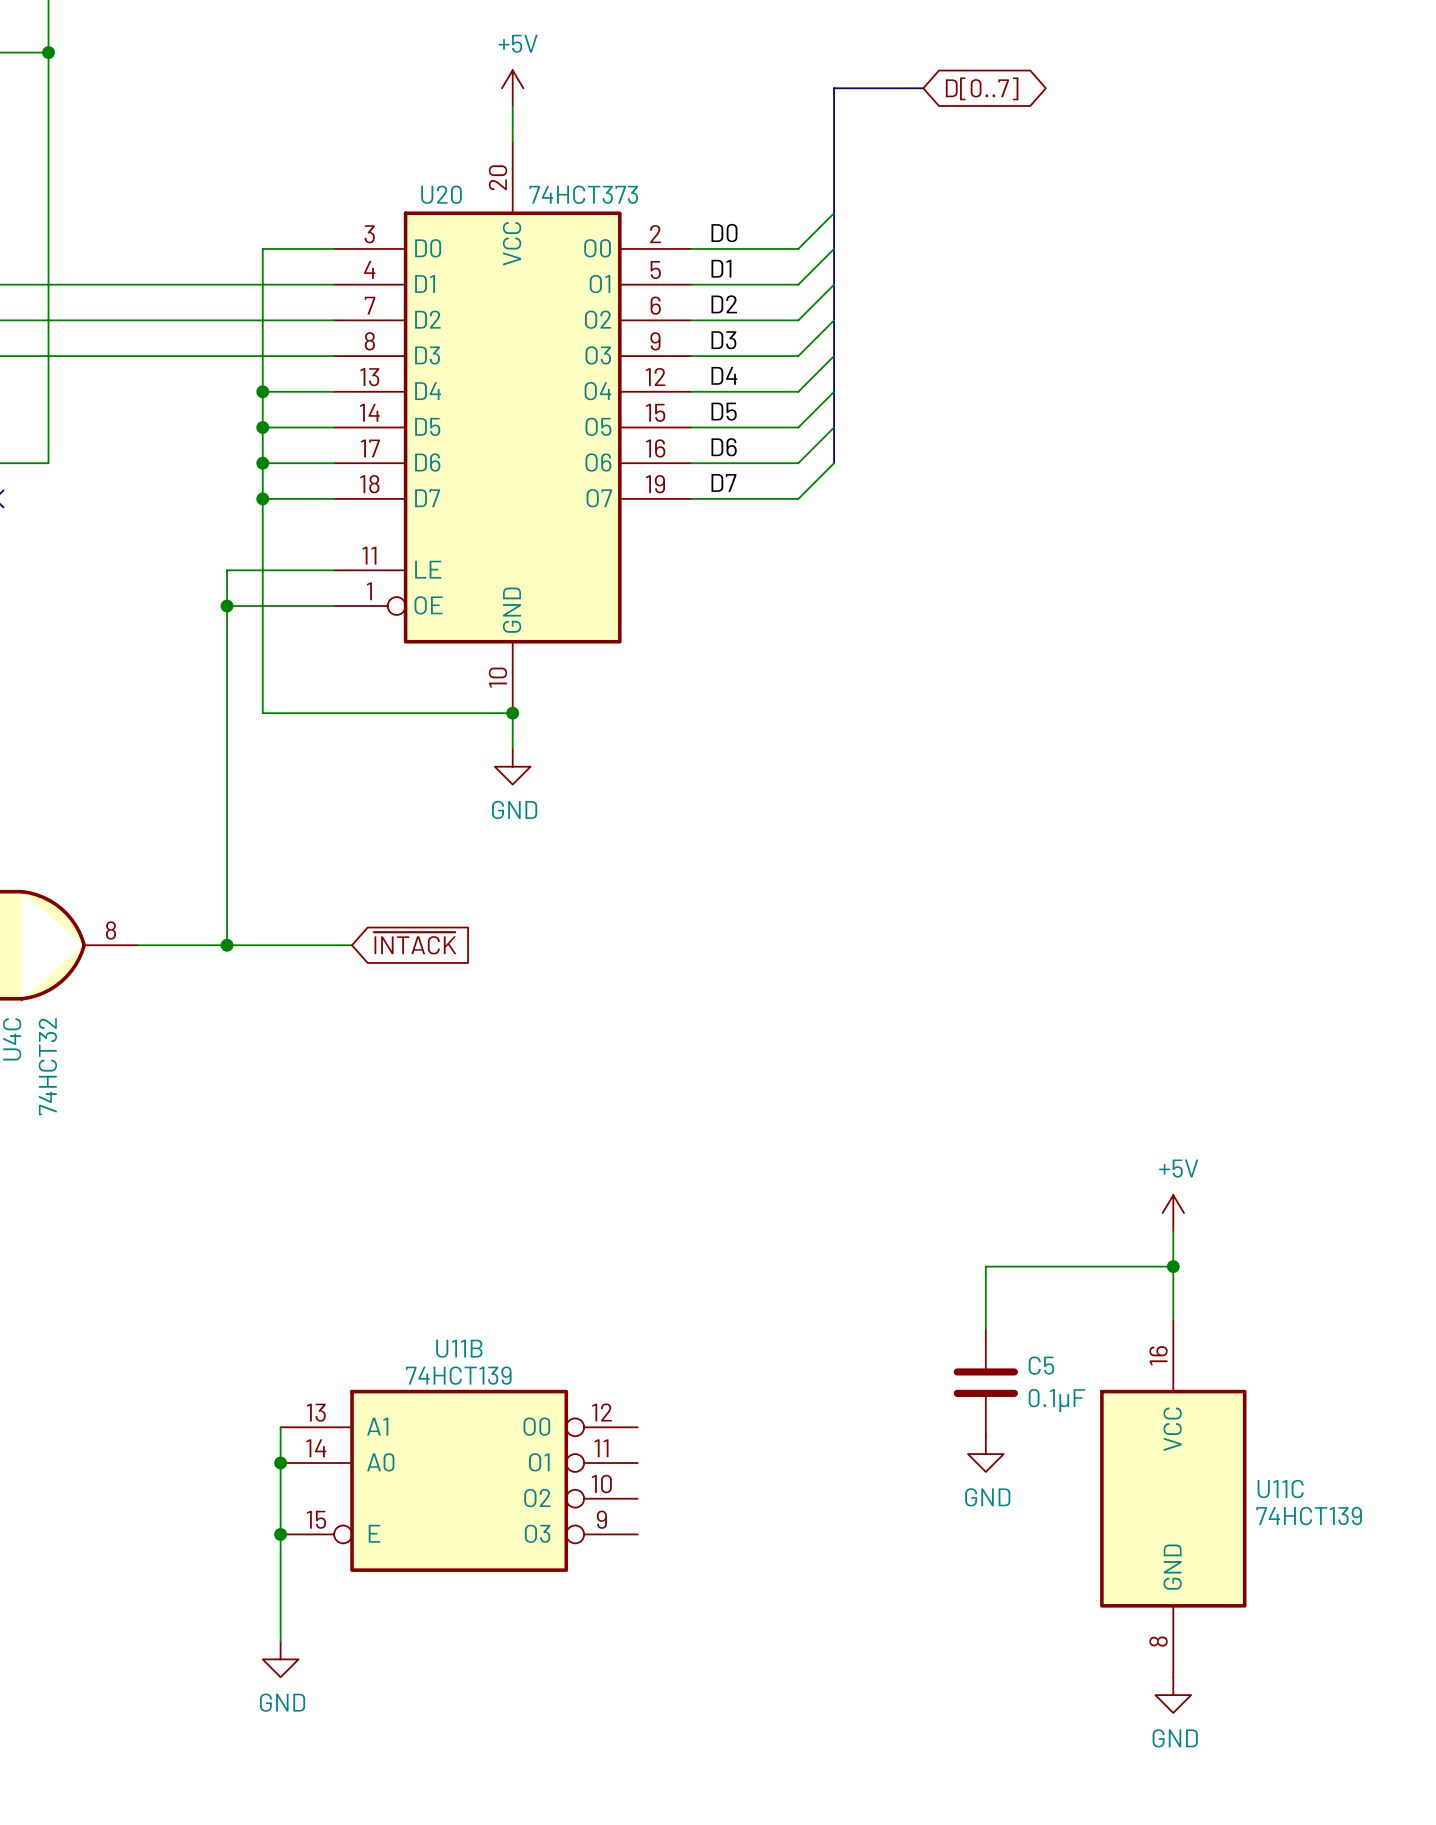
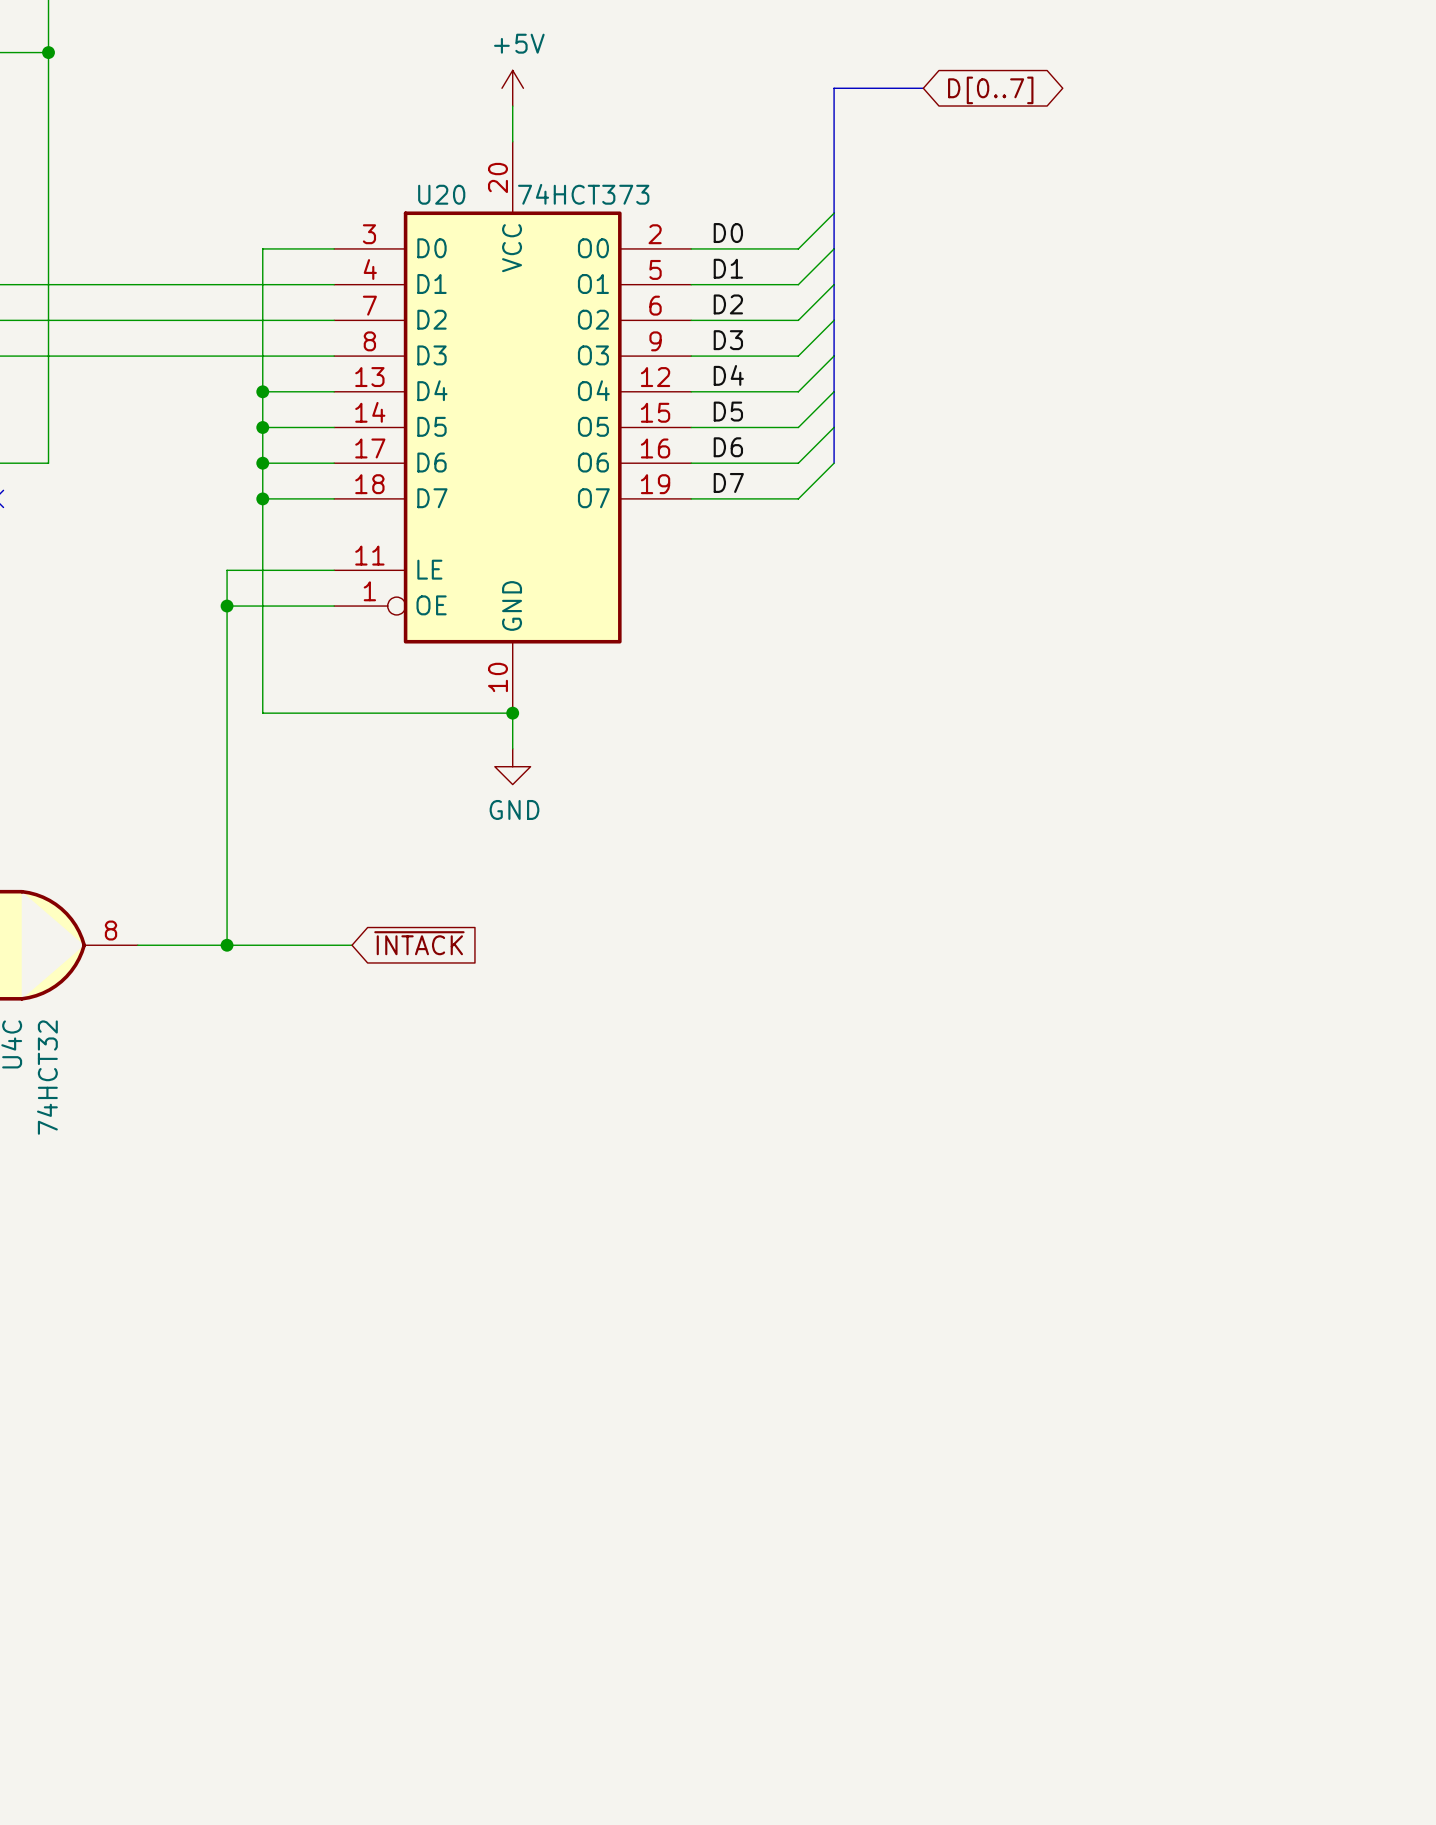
power symbol: +5V (1173, 1213) -> none
wire: (1173, 1230) (1173, 1320) -> none
wire: (1173, 1266) (985, 1266) (985, 1329) -> none
junction: (1173, 1266) -> none
C5: 0.1µF (985, 1382) -> none
wire: (280, 1427) (280, 1641) -> none
power symbol: GND (985, 1454) -> none
junction: (280, 1463) -> none
U11B: 74HCT139 (459, 1480) -> none
U11C: 74HCT139 (1173, 1498) -> none
junction: (280, 1534) -> none
power symbol: GND (280, 1659) -> none
power symbol: GND (1173, 1695) -> none

